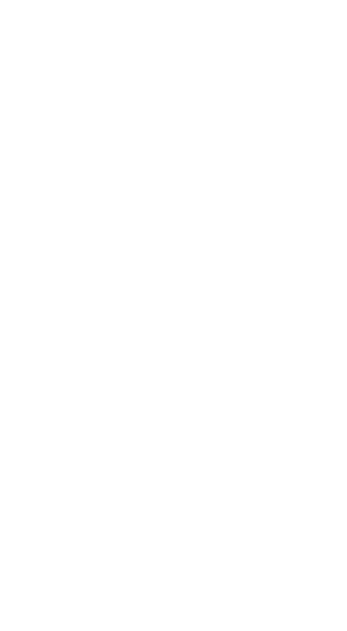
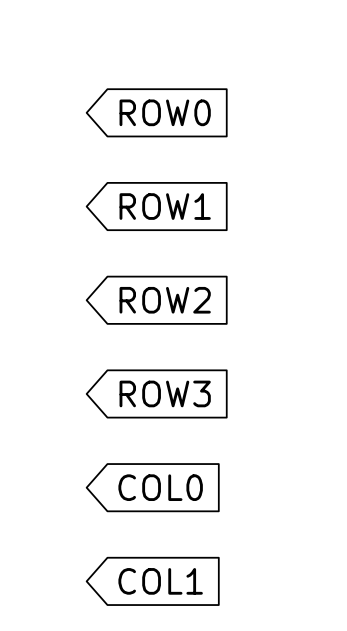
global label: none -> ROW0 (165, 112)
global label: none -> ROW1 (165, 206)
global label: none -> ROW2 (165, 300)
global label: none -> ROW3 (165, 393)
global label: none -> COL0 (160, 487)
global label: none -> COL1 (160, 581)

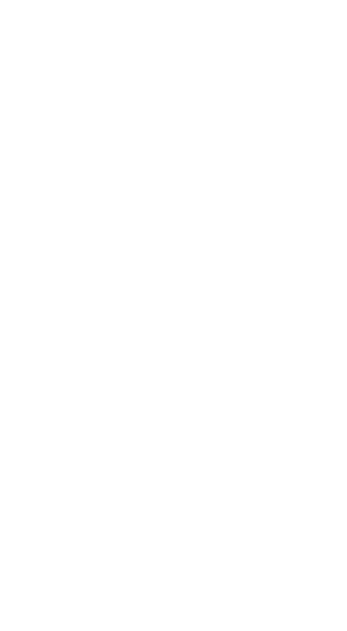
global label: ROW0 (165, 112) -> none
global label: ROW1 (165, 206) -> none
global label: ROW2 (165, 300) -> none
global label: ROW3 (165, 393) -> none
global label: COL0 (160, 487) -> none
global label: COL1 (160, 581) -> none

